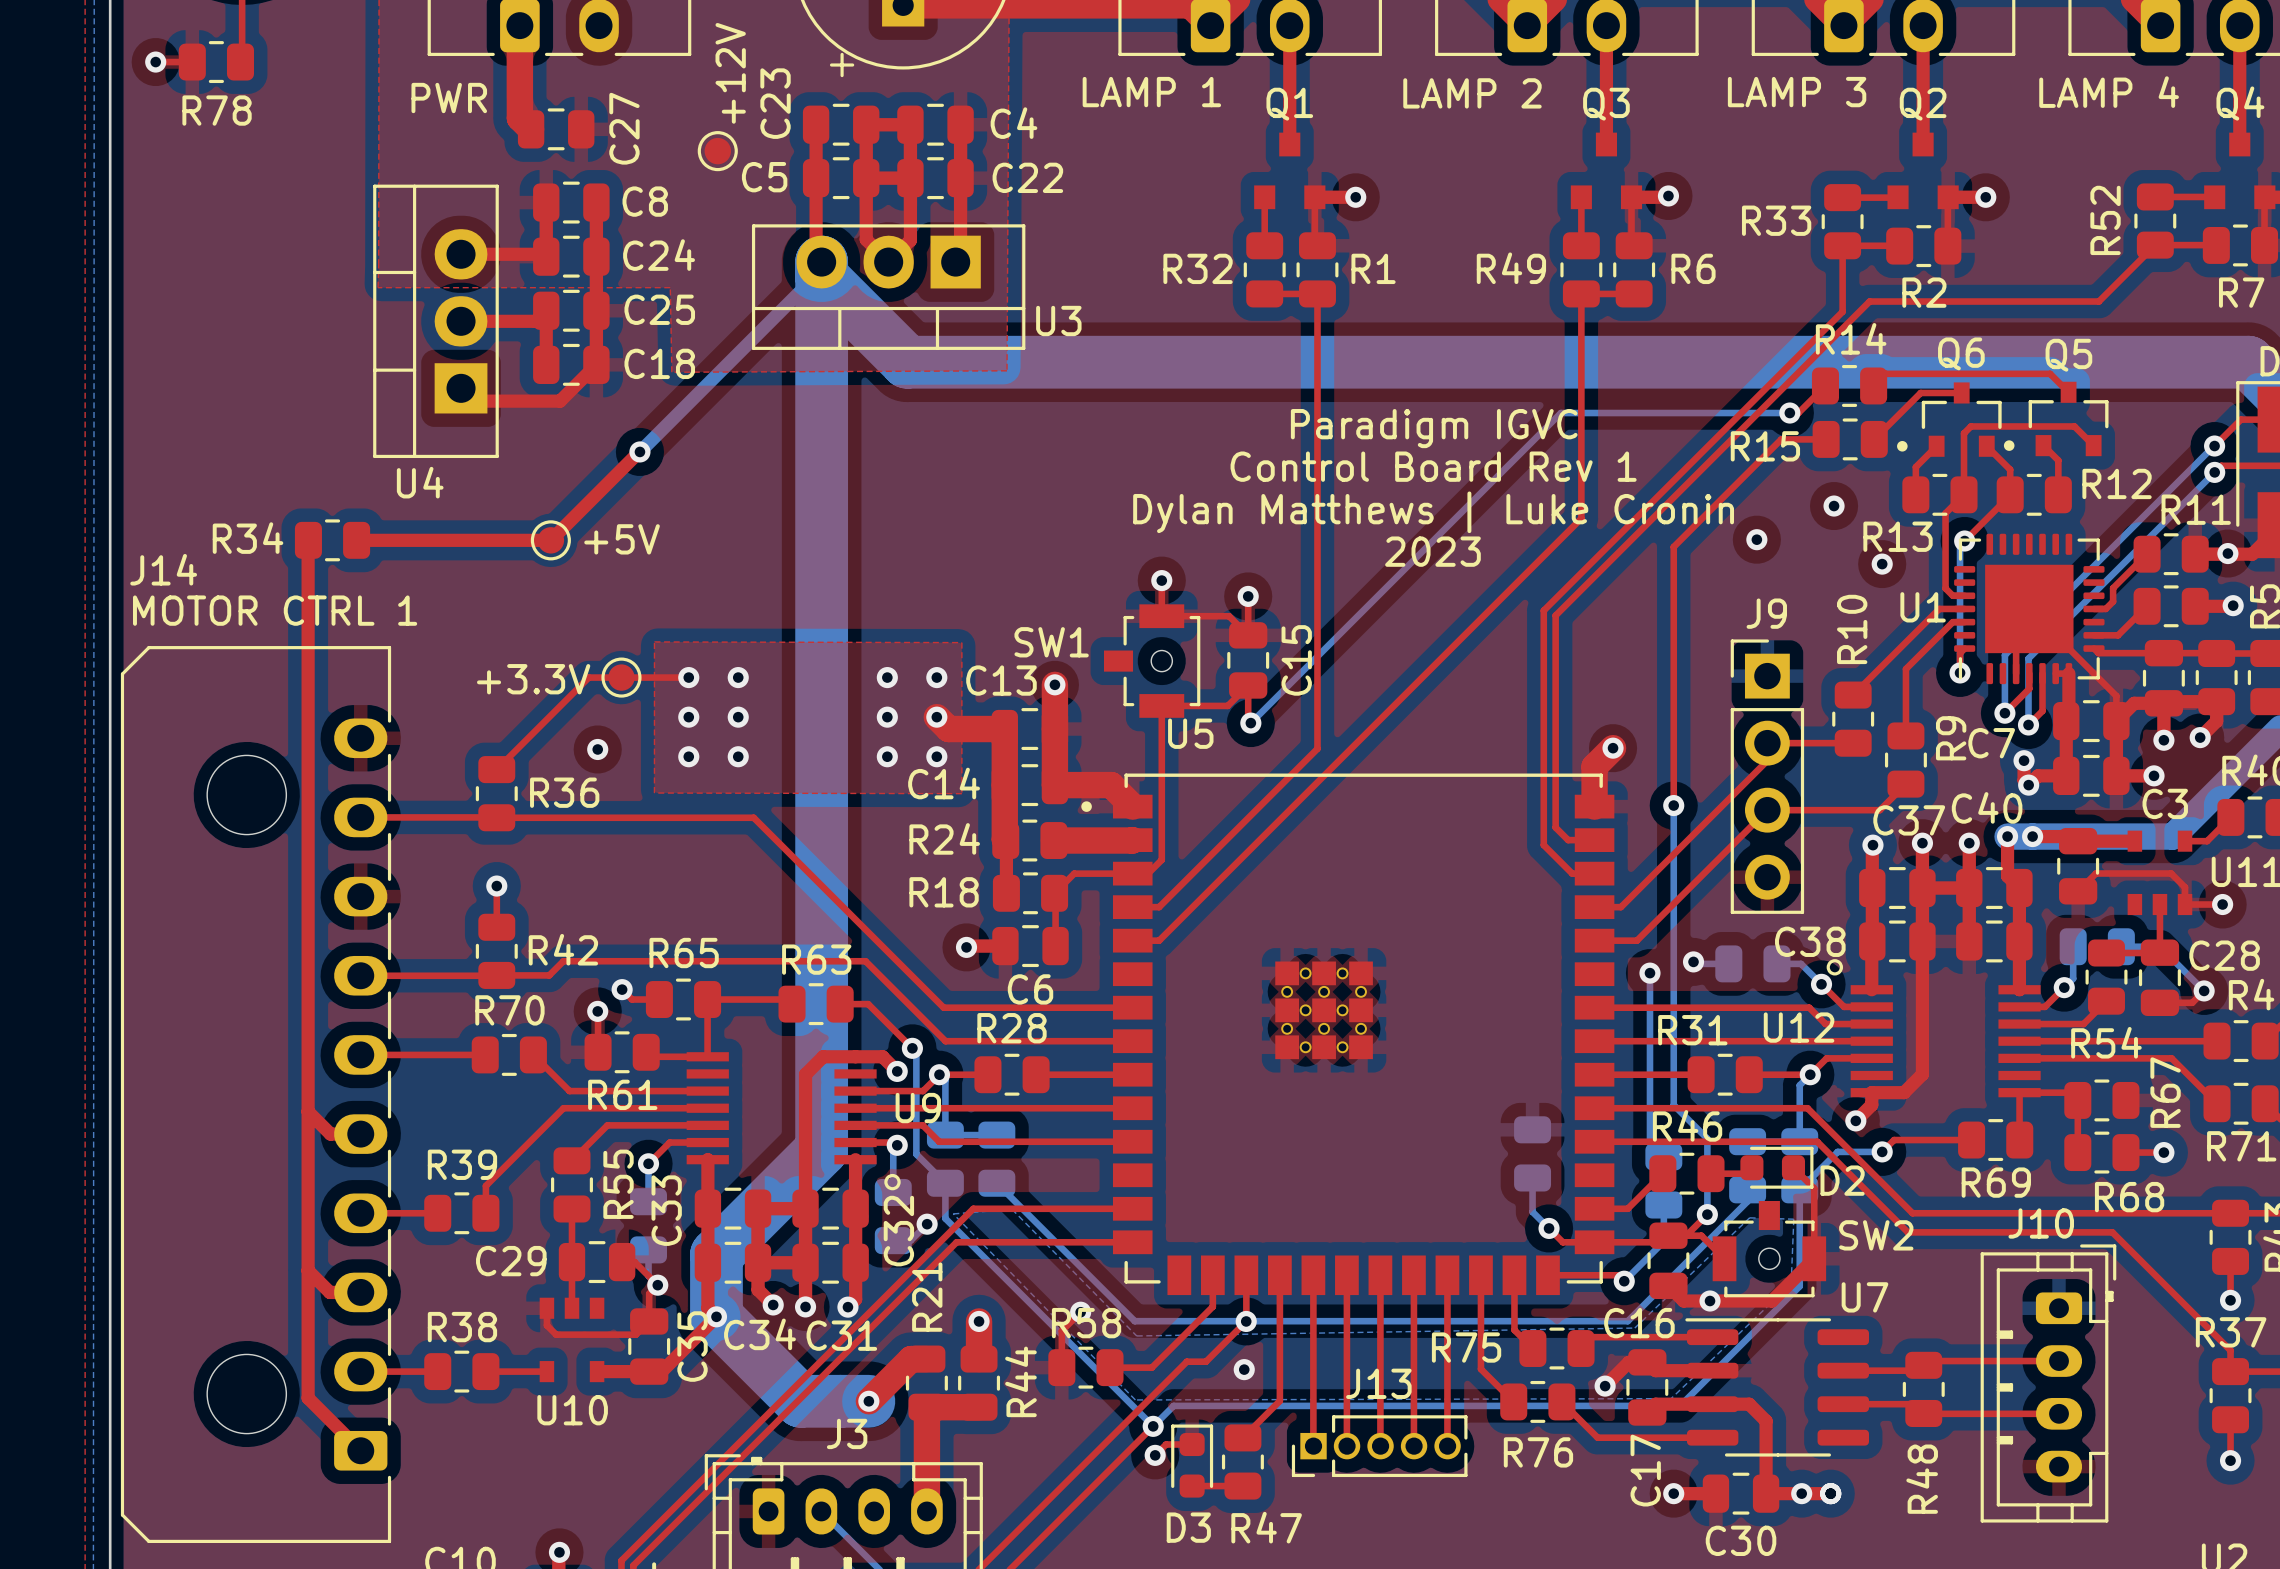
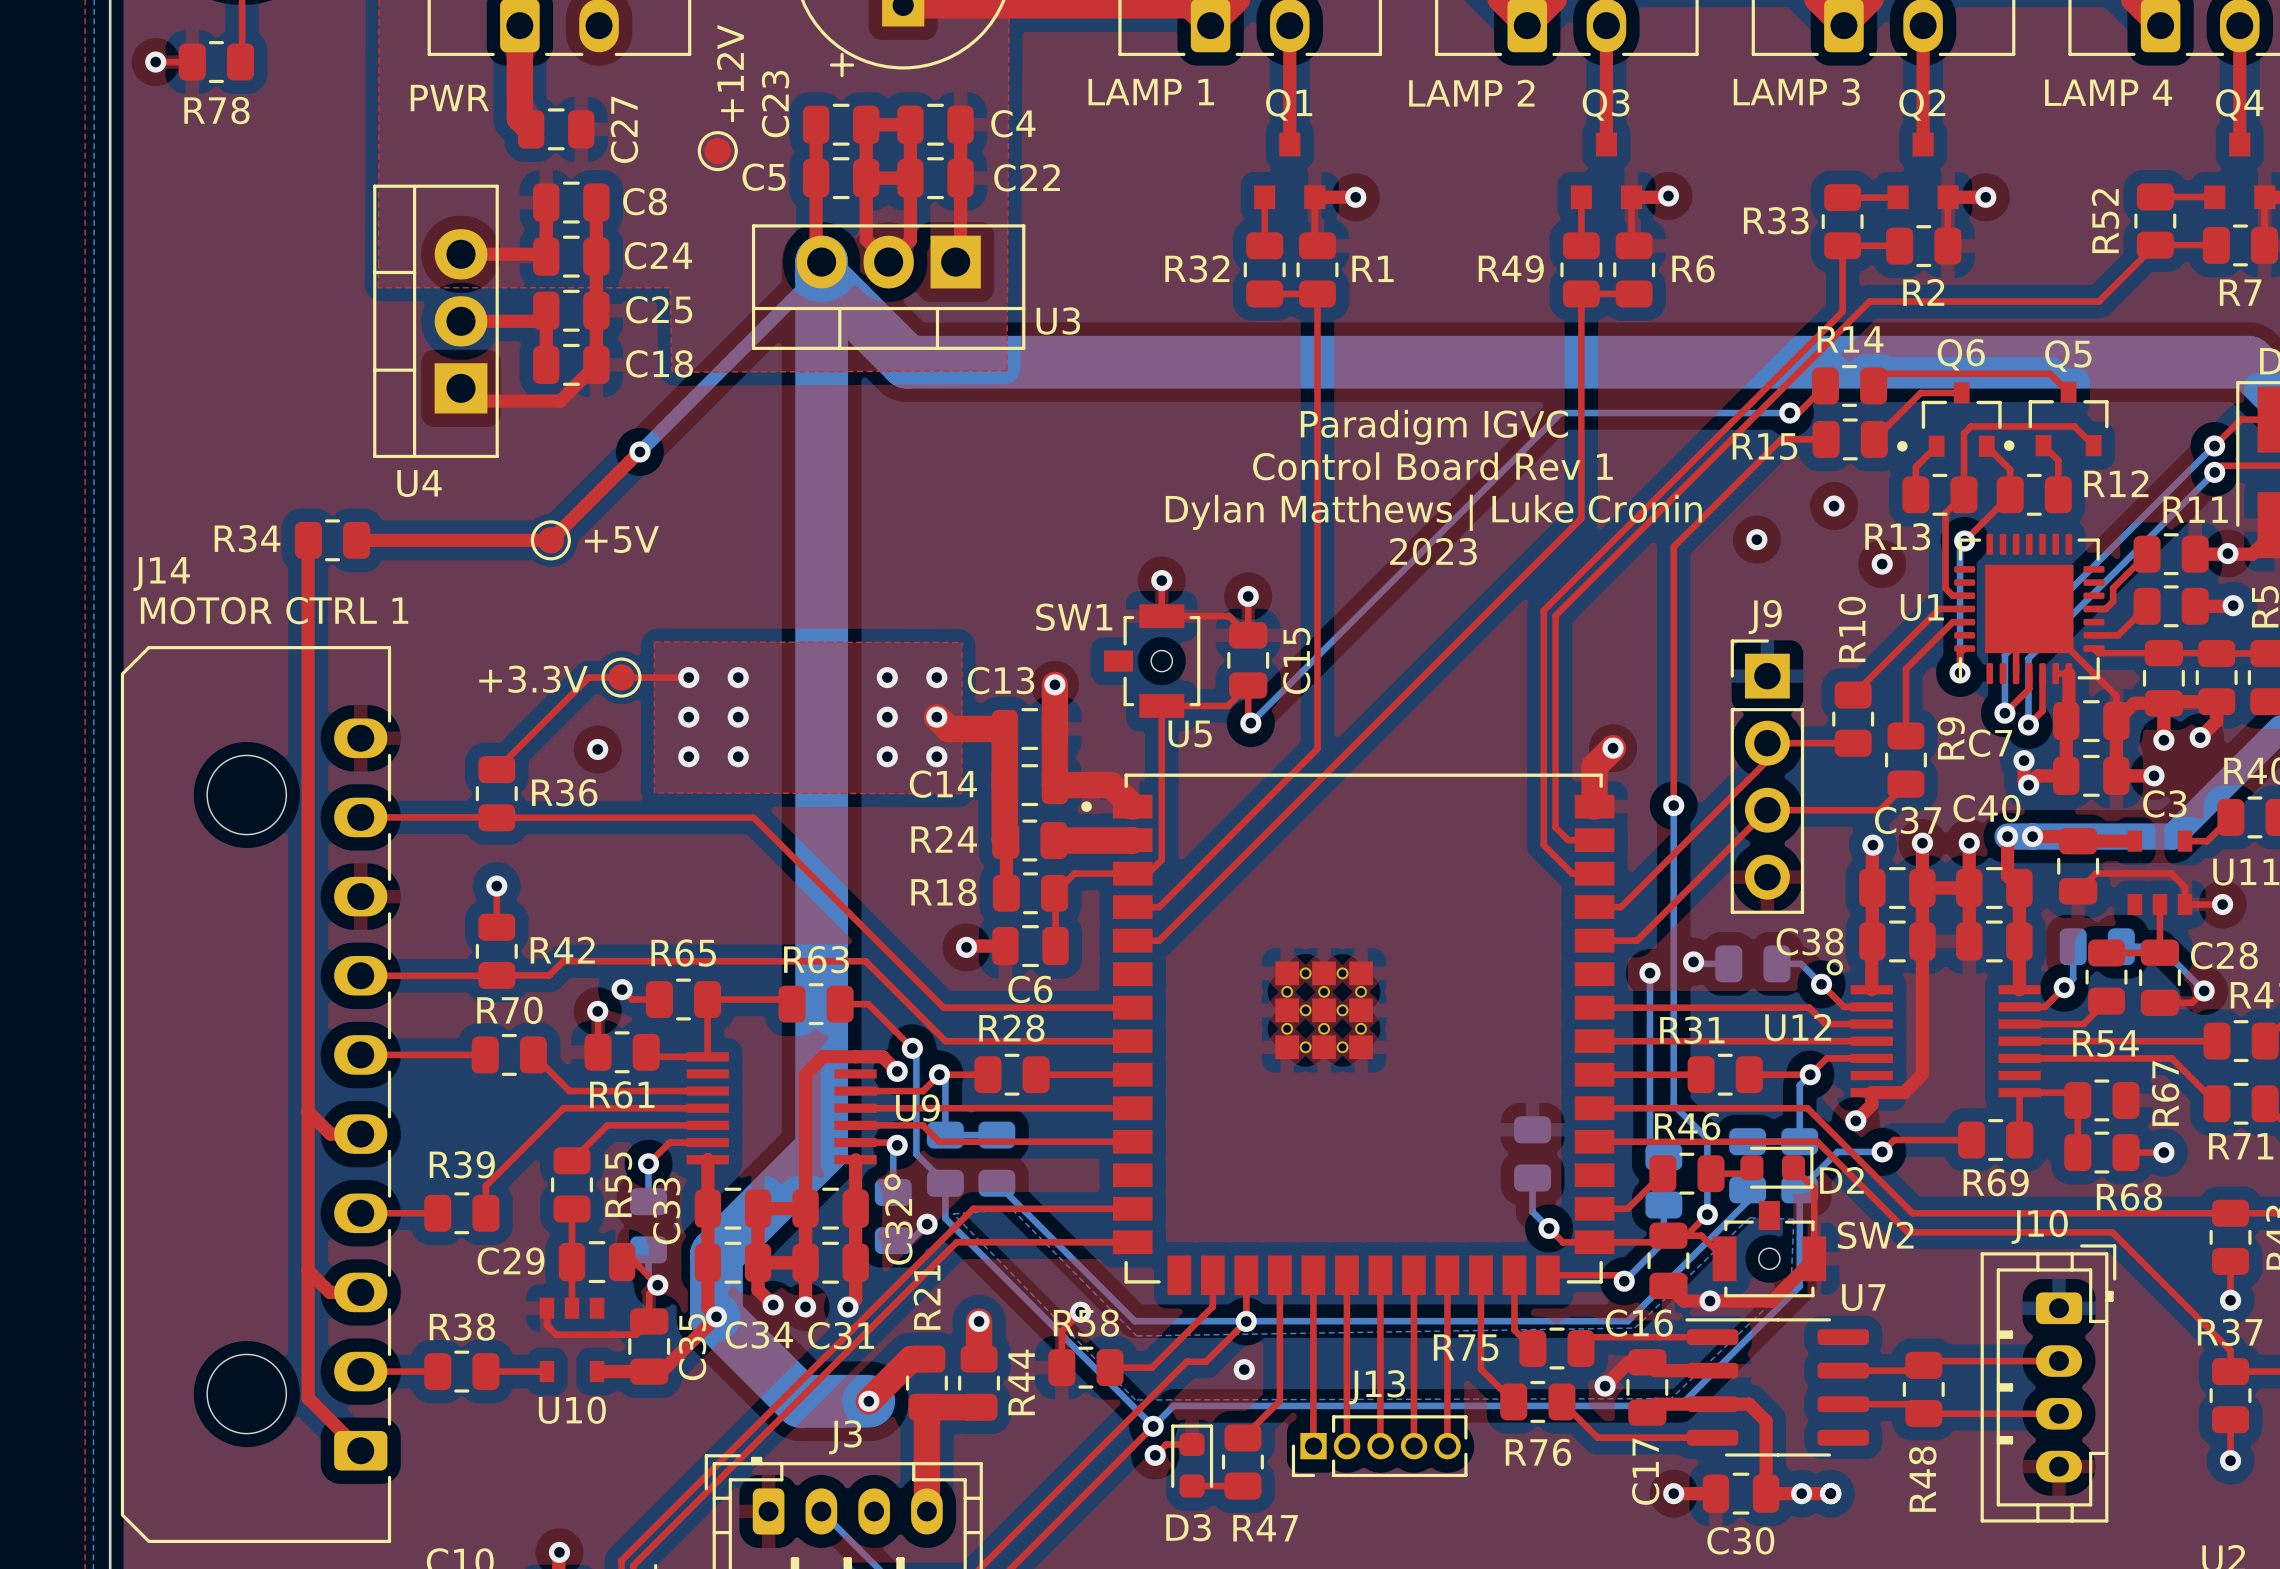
SW1 name position: SW1 (1051, 642) -> SW1 (1074, 617)

